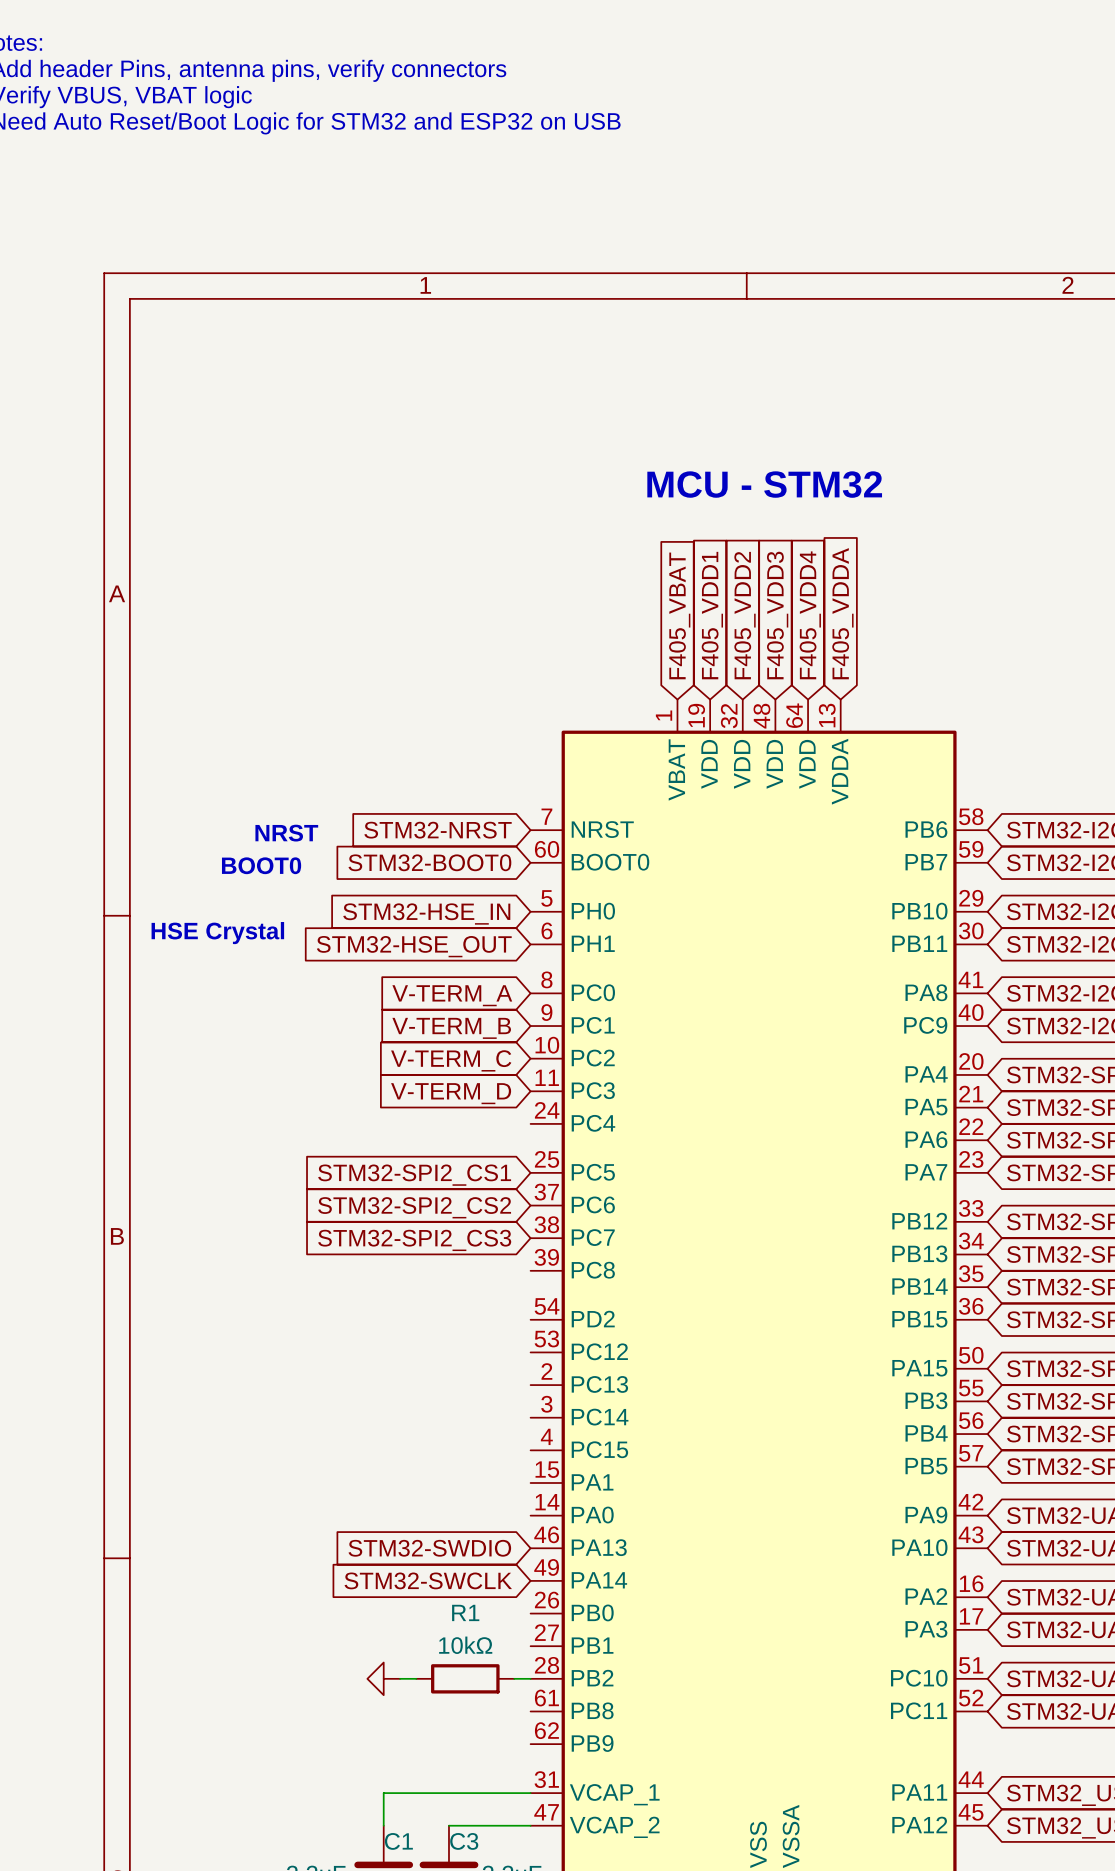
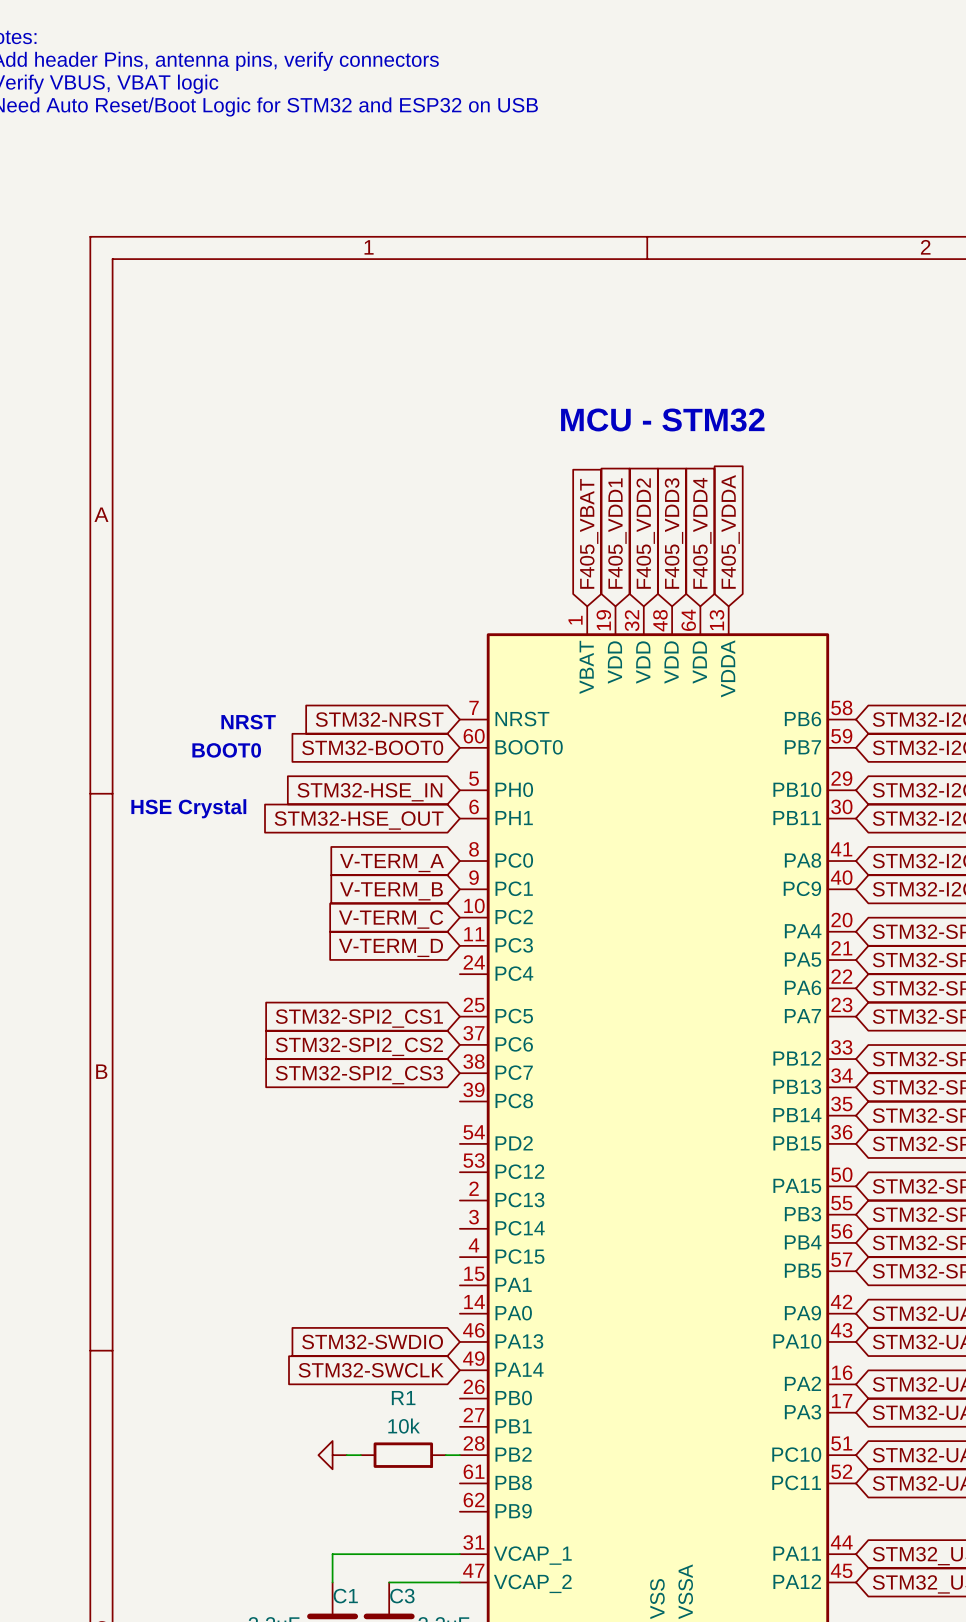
R1 value: 10kΩ (465, 1645) -> 10k (404, 1426)

